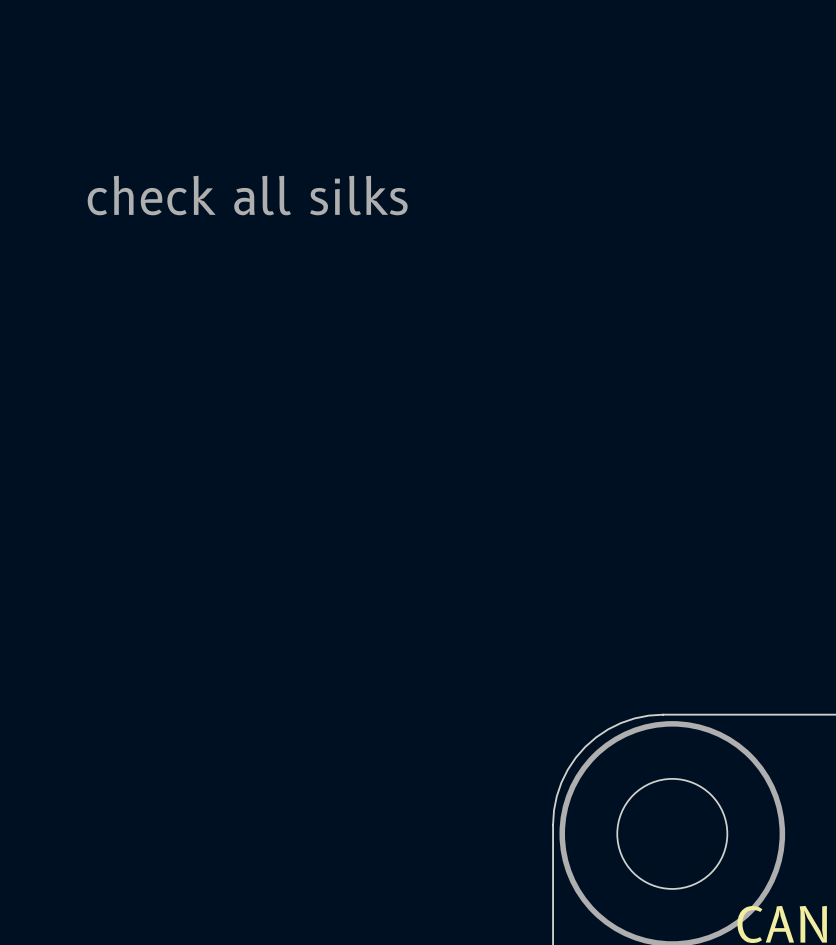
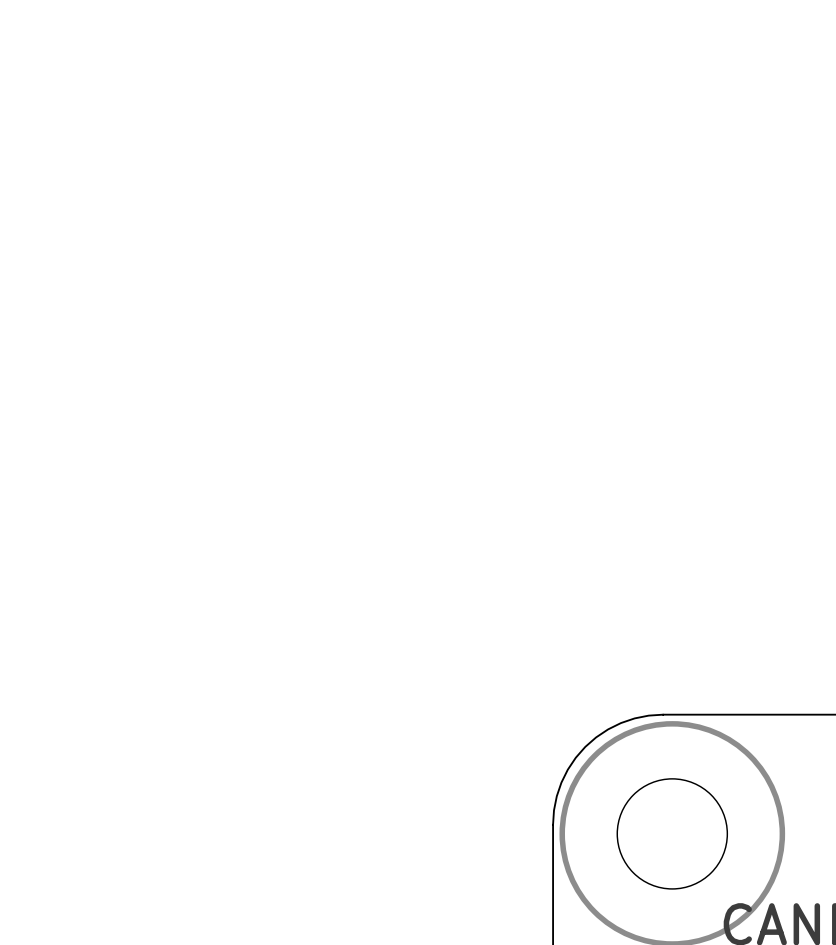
text: check all silks (247, 195) -> none

